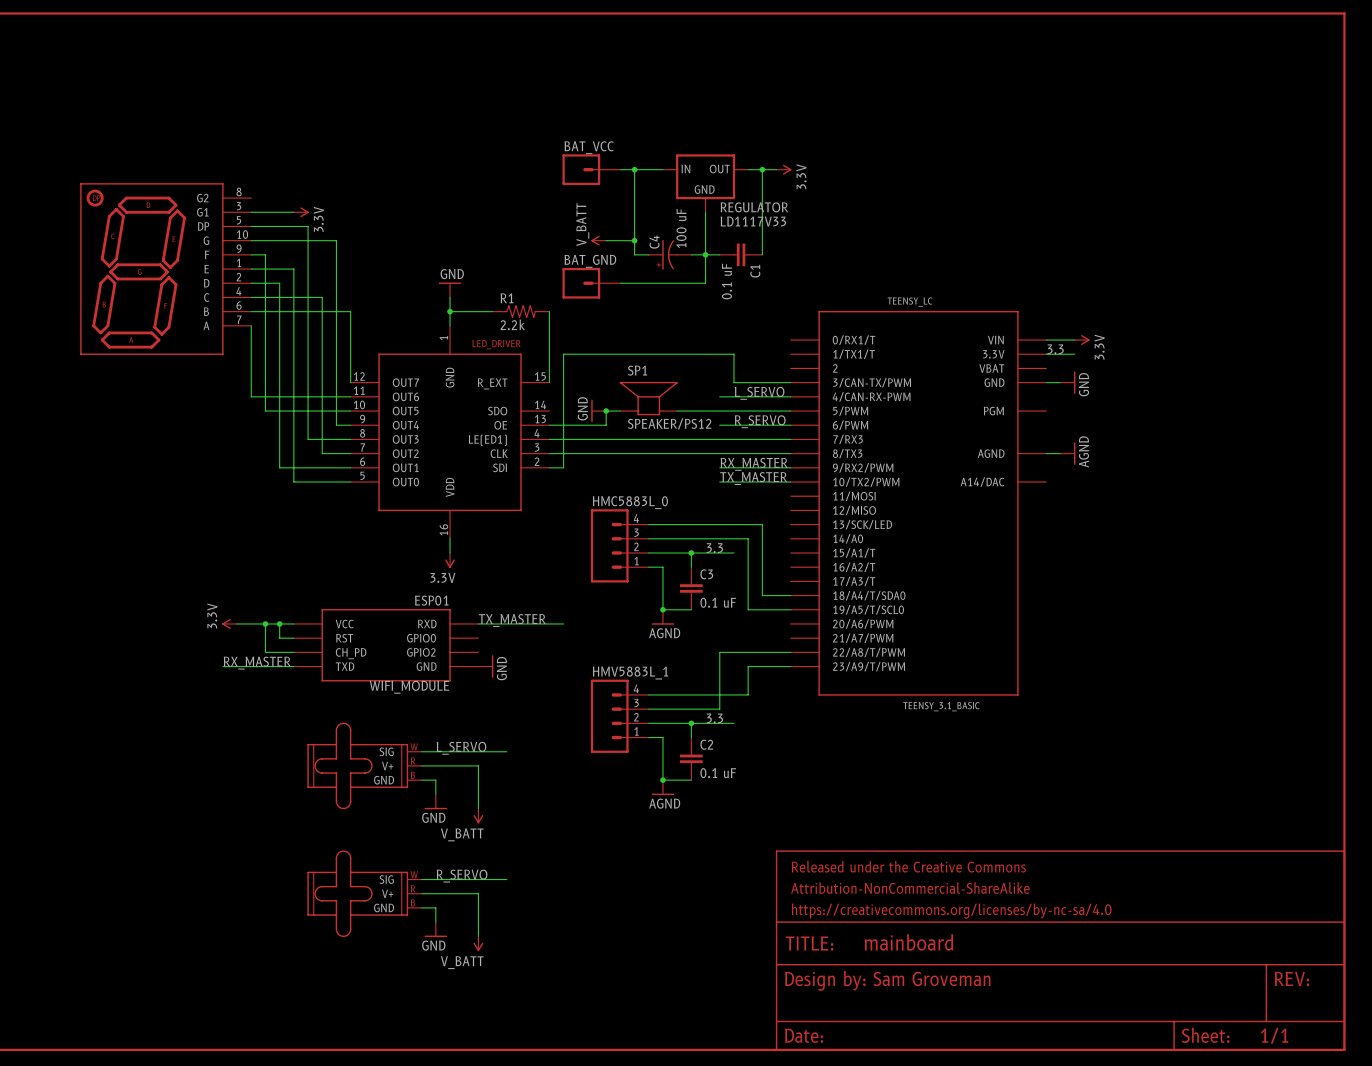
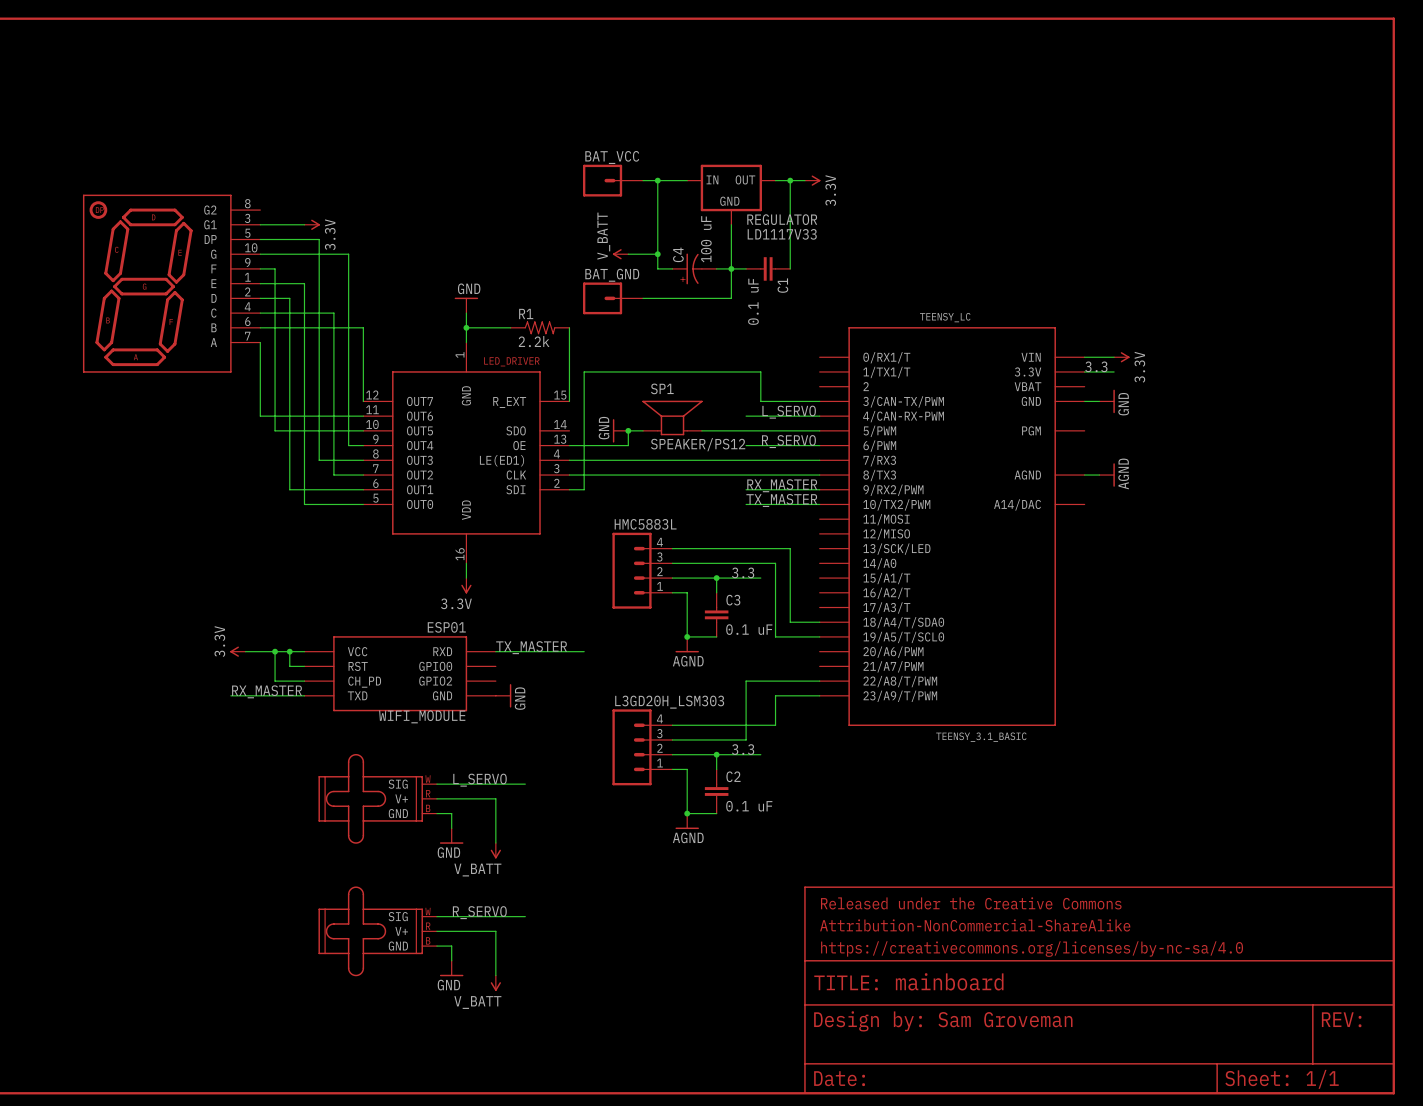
HMC5883L_0 name: HMC5883L_0 (630, 502) -> HMC5883L (645, 524)
HMV5883L_1 name: HMV5883L_1 (630, 673) -> L3GD20H_LSM303 (669, 702)

